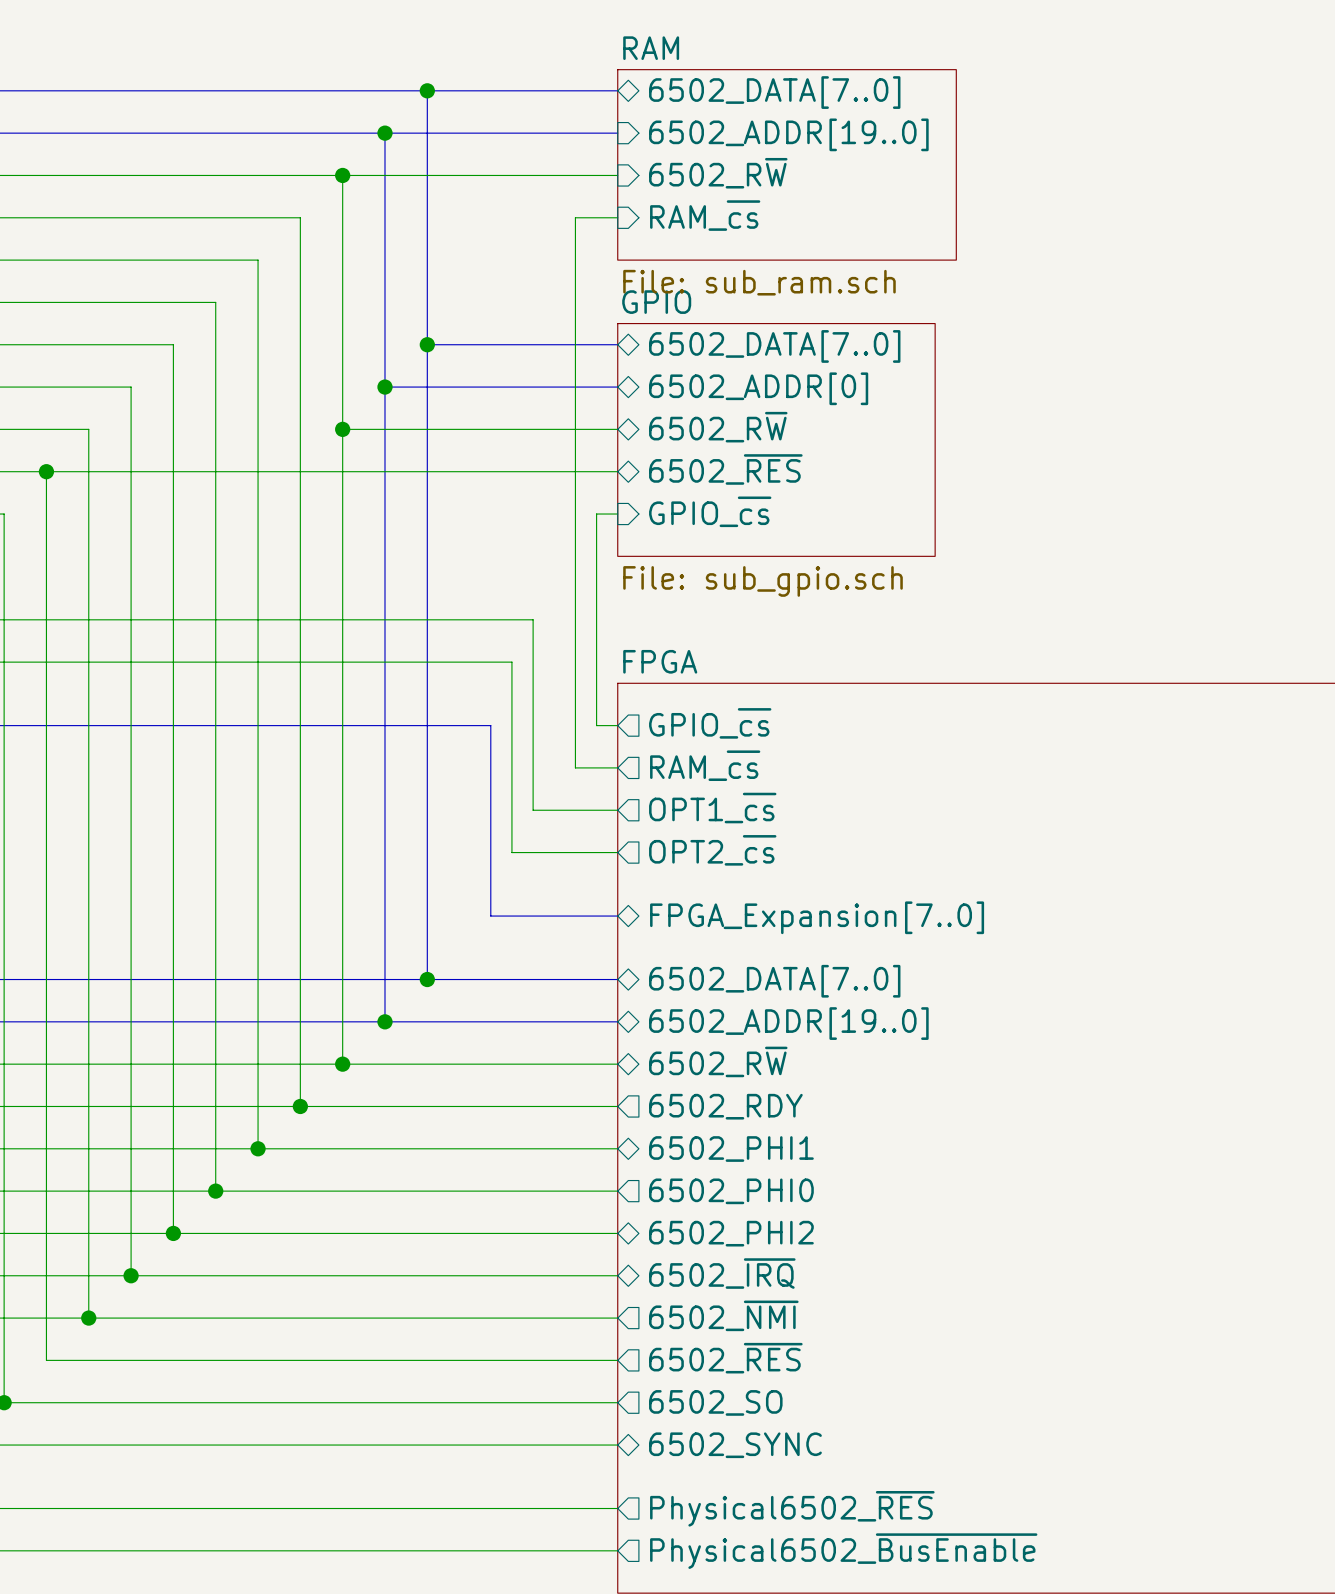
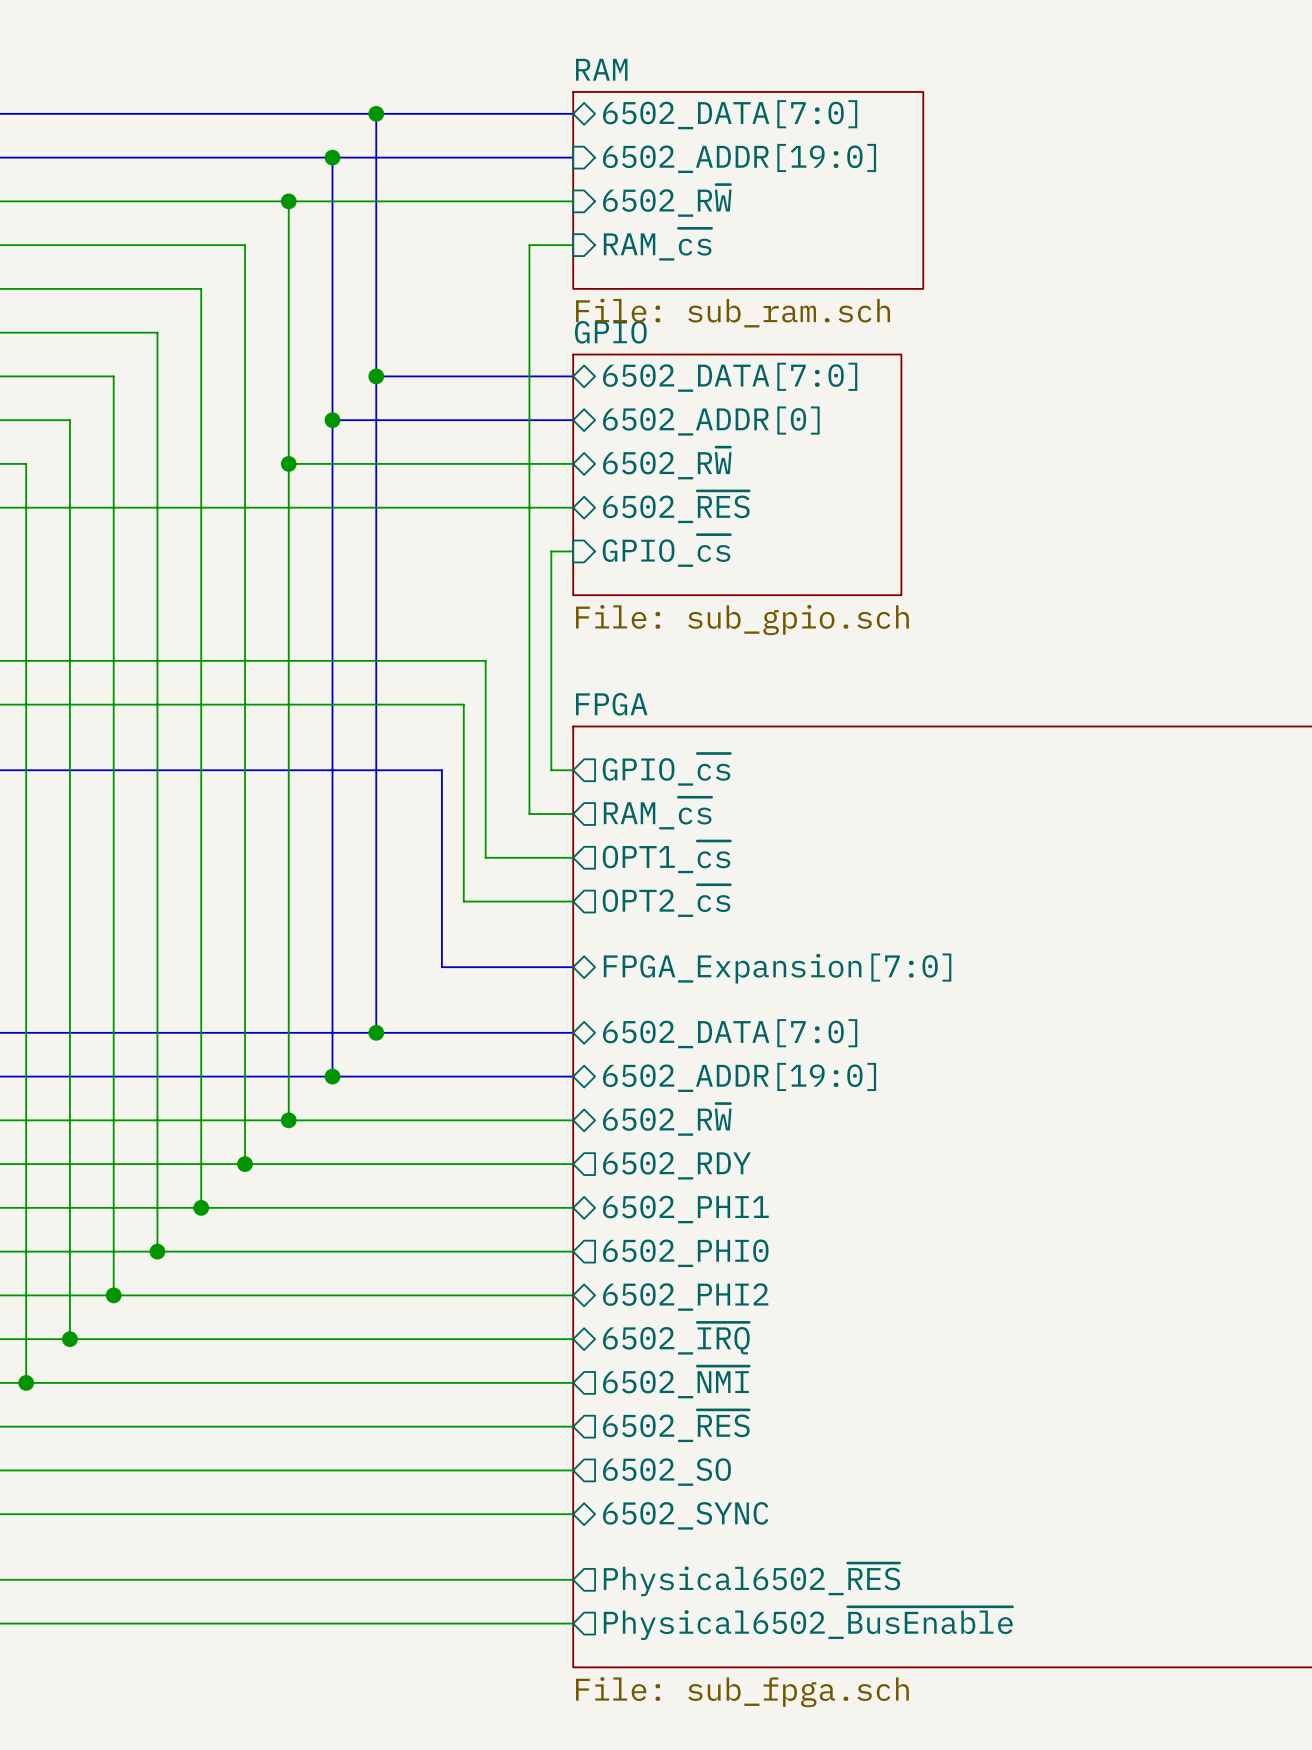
sheet pin: 6502_DATA[7..0] (774, 92) -> 6502_DATA[7:0] (730, 114)
sheet pin: 6502_ADDR[19..0] (788, 134) -> 6502_ADDR[19:0] (739, 158)
sheet pin: 6502_DATA[7..0] (774, 346) -> 6502_DATA[7:0] (730, 377)
sheet pin: FPGA_Expansion[7..0] (817, 917) -> FPGA_Expansion[7:0] (777, 968)
sheet pin: 6502_DATA[7..0] (774, 981) -> 6502_DATA[7:0] (730, 1033)
sheet pin: 6502_ADDR[19..0] (788, 1023) -> 6502_ADDR[19:0] (739, 1077)

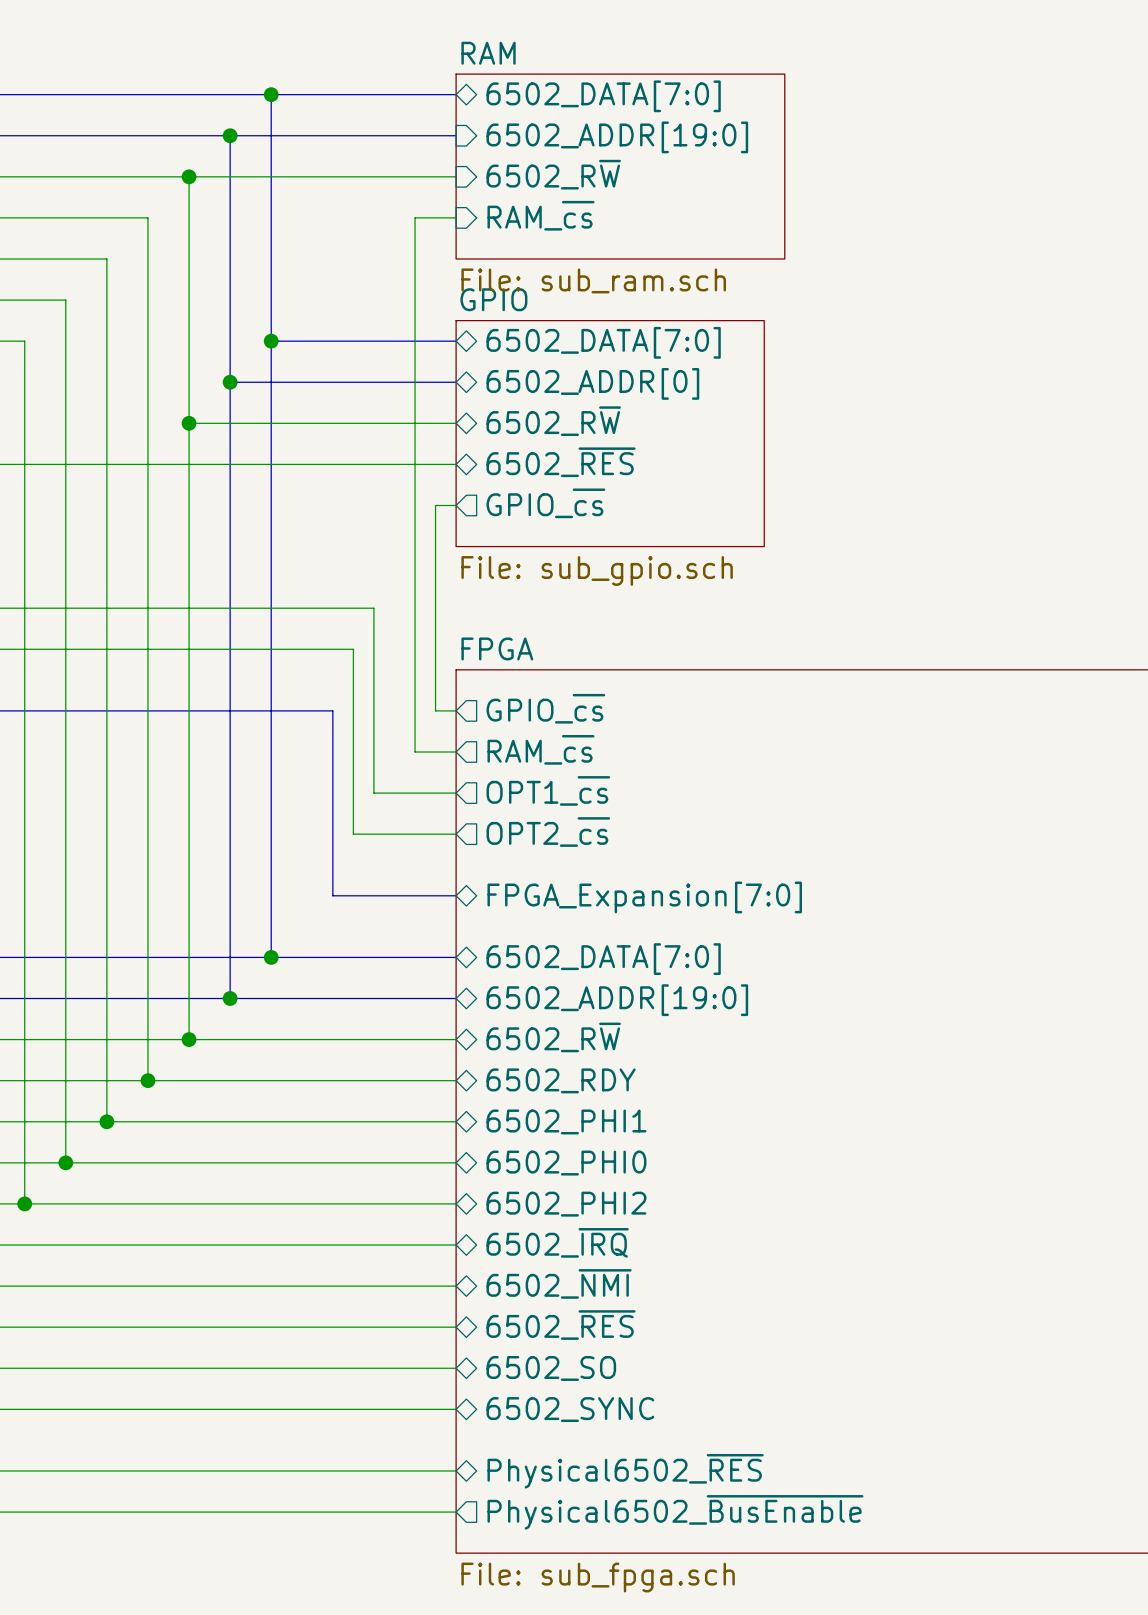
sheet pin shape: input (666, 550) -> output (545, 503)
sheet pin shape: output (676, 1165) -> bidirectional (561, 1080)
sheet pin shape: output (685, 1253) -> bidirectional (566, 1163)
sheet pin shape: output (676, 1382) -> bidirectional (559, 1283)
sheet pin shape: output (676, 1425) -> bidirectional (561, 1325)
sheet pin shape: output (666, 1472) -> bidirectional (551, 1368)
sheet pin shape: output (751, 1579) -> bidirectional (625, 1471)

